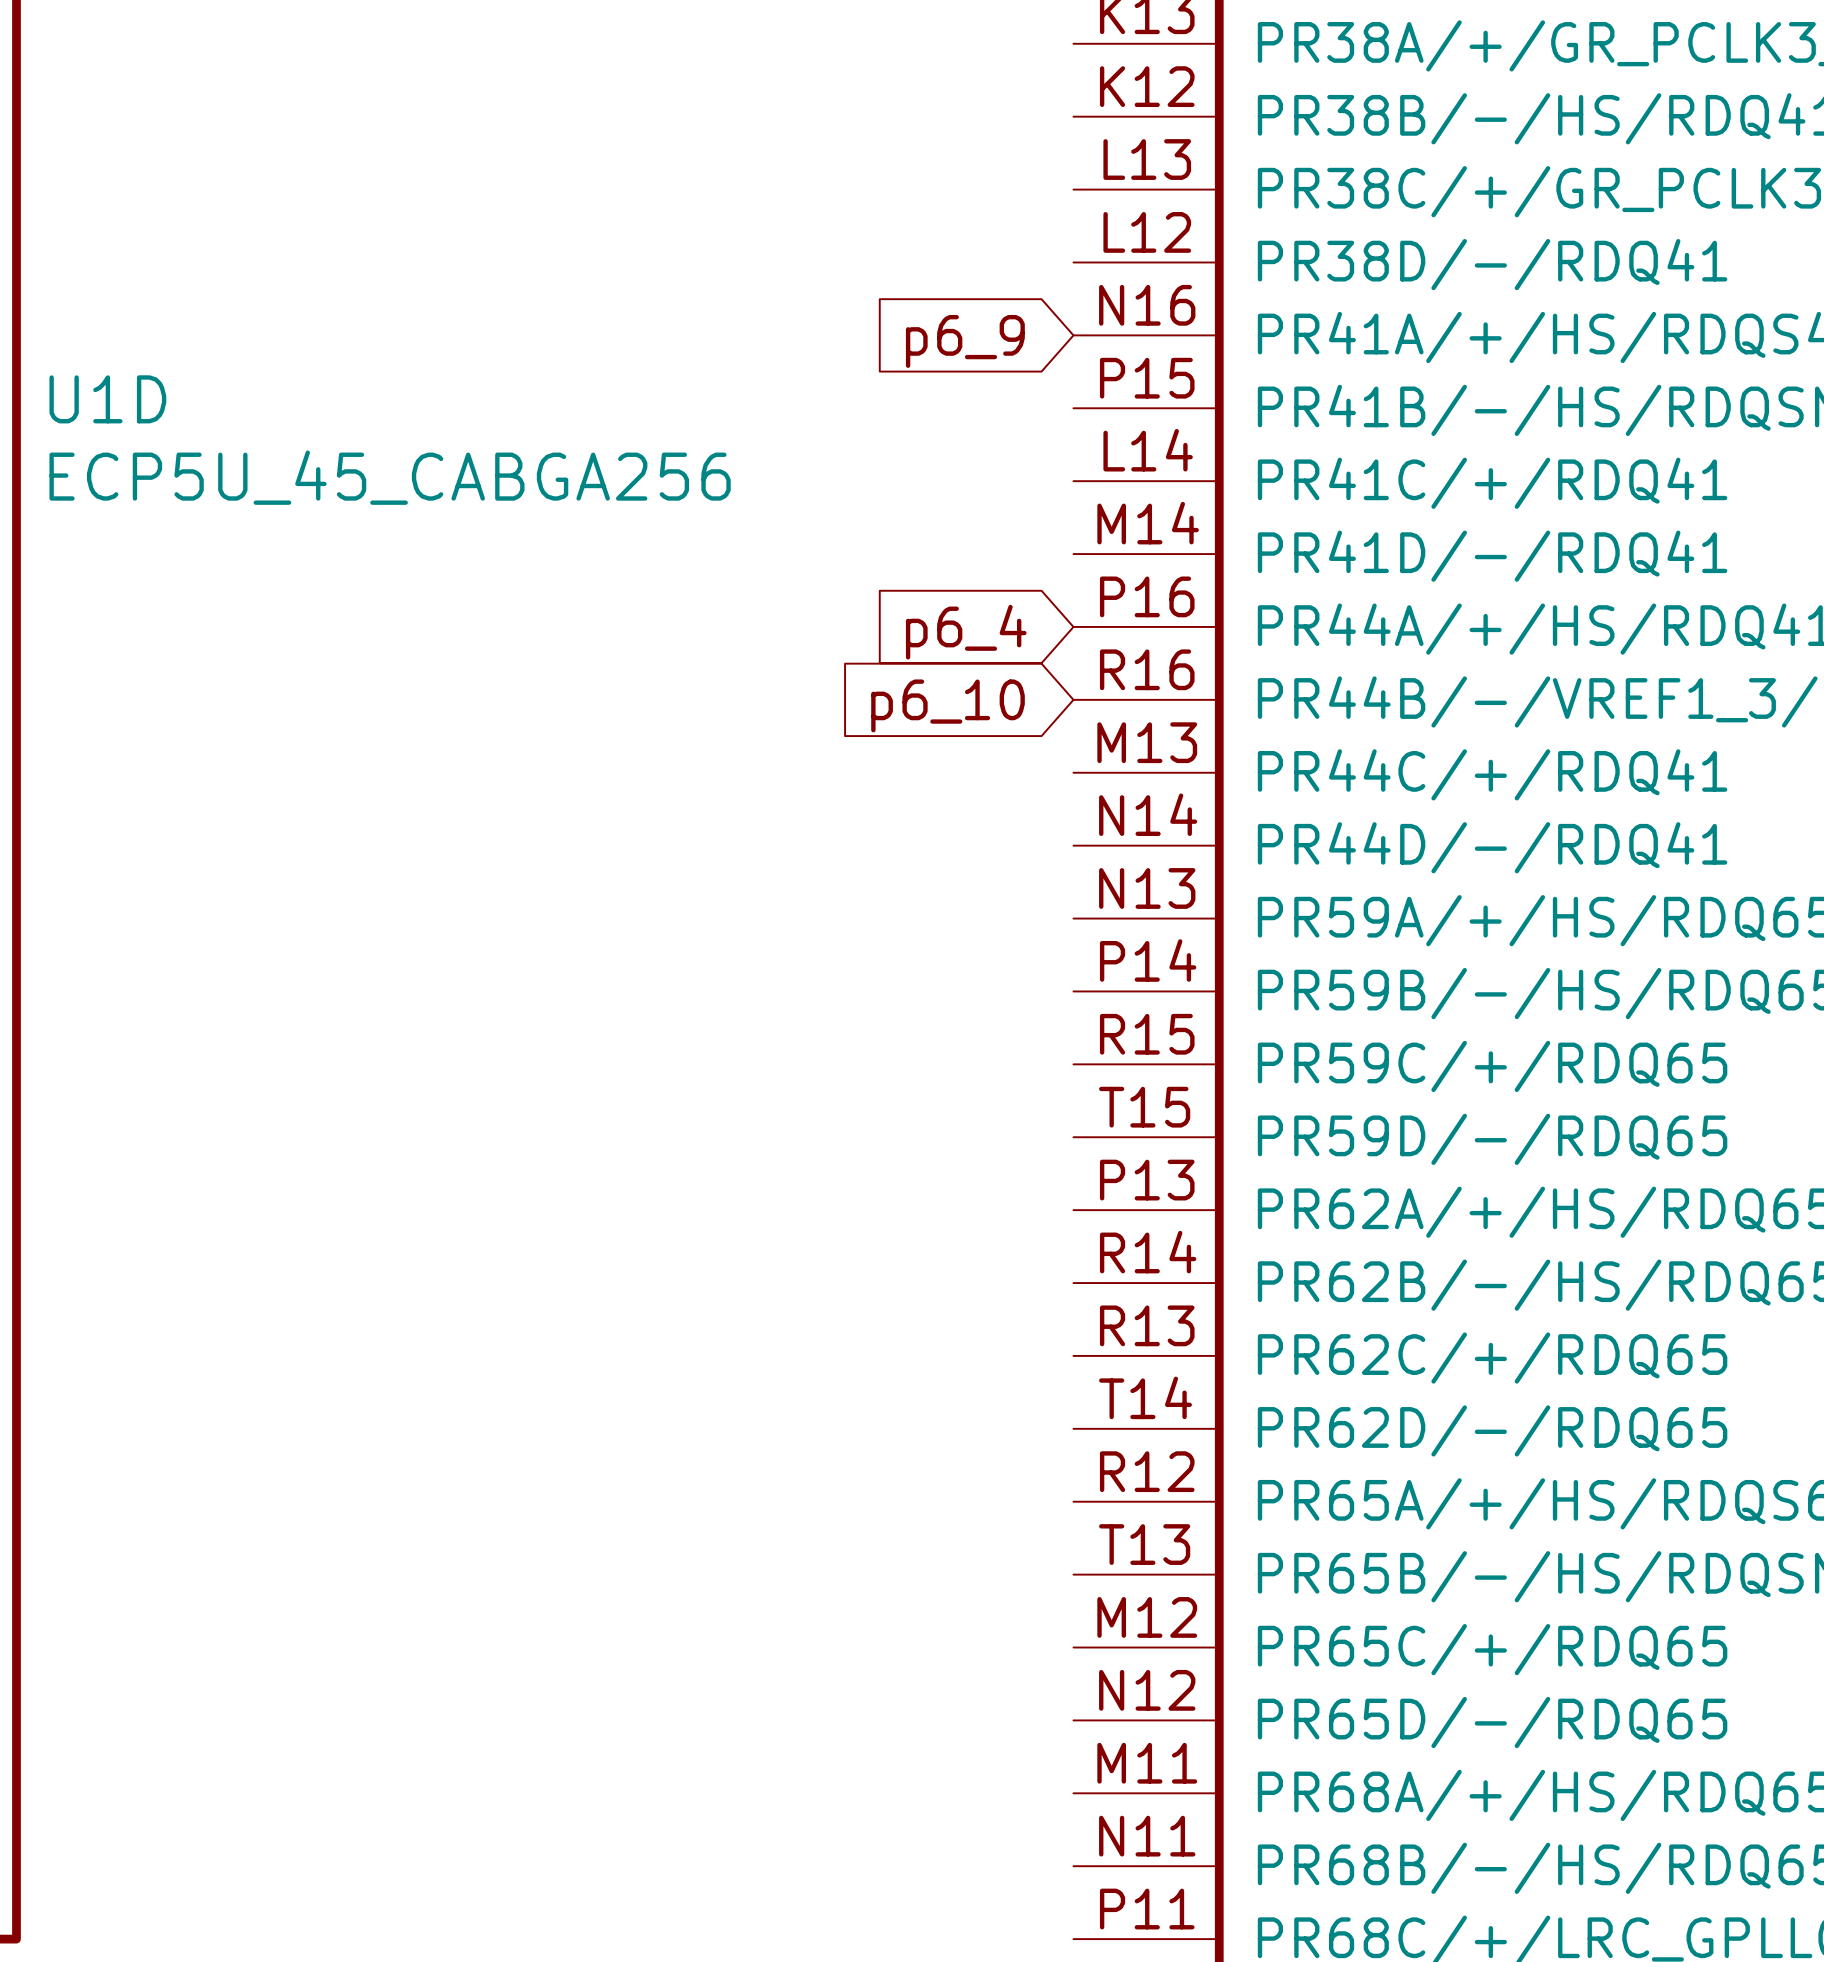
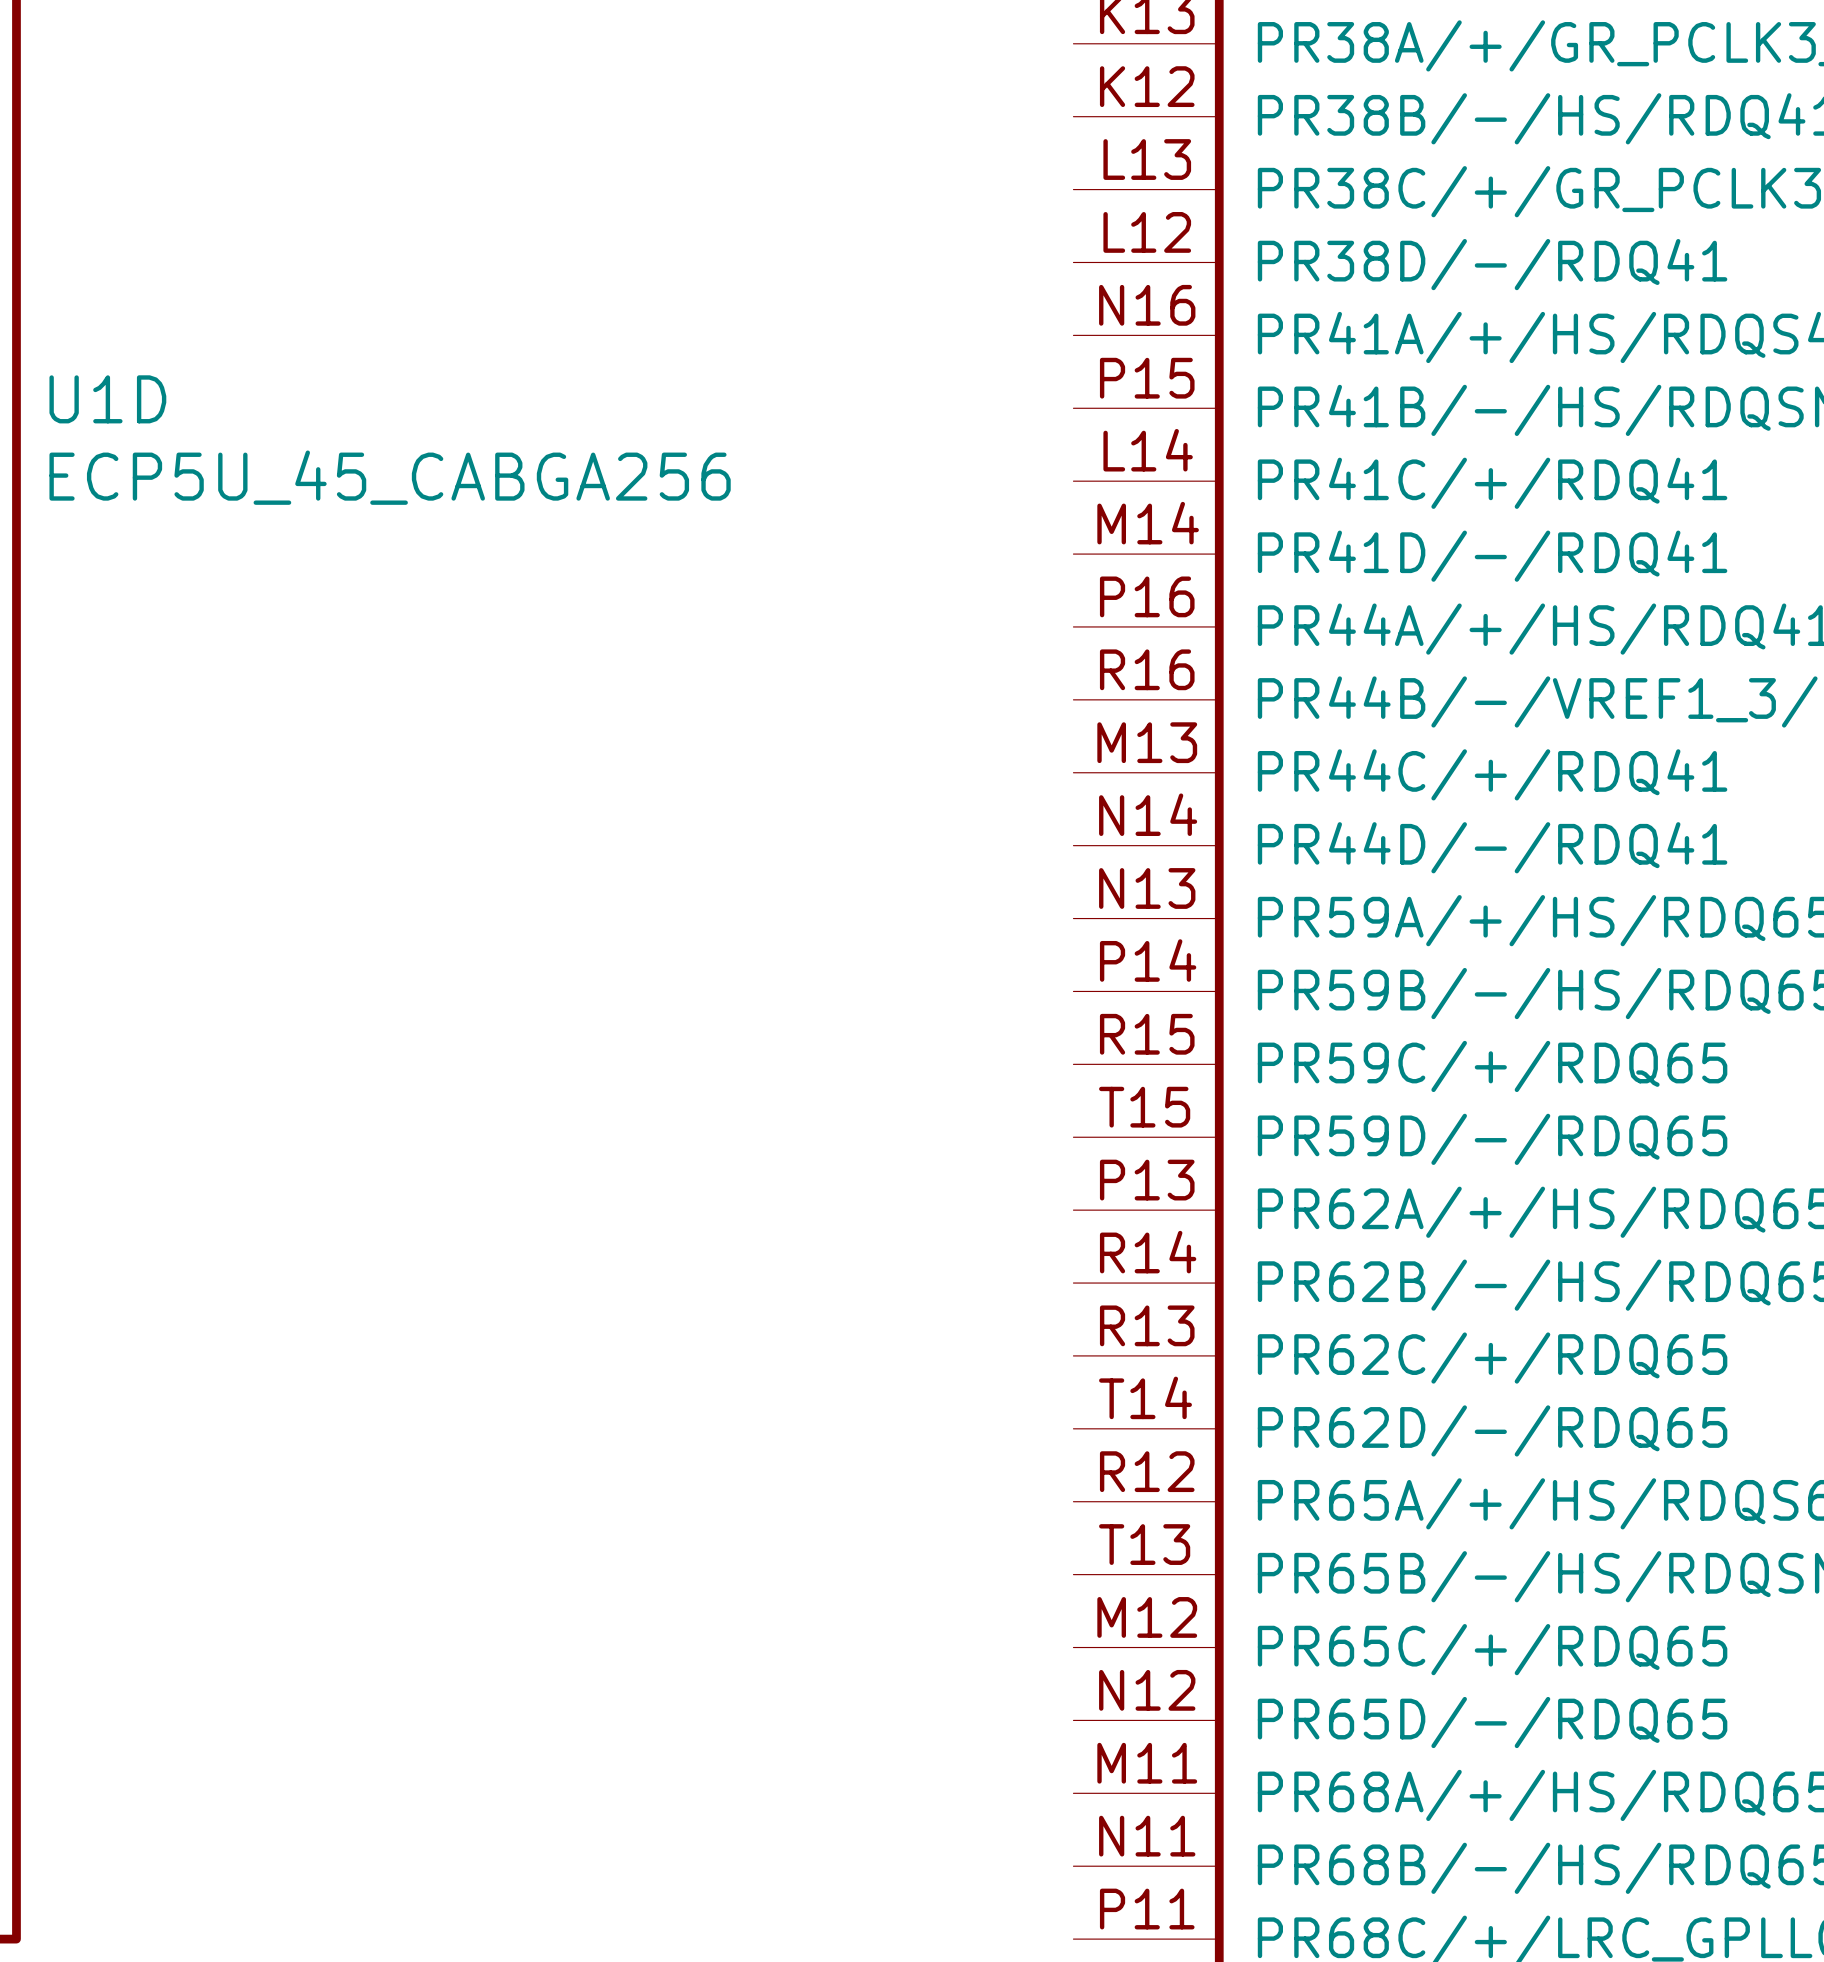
global label: p6_9 (965, 341) -> none
global label: p6_4 (966, 632) -> none
global label: p6_10 (948, 705) -> none

